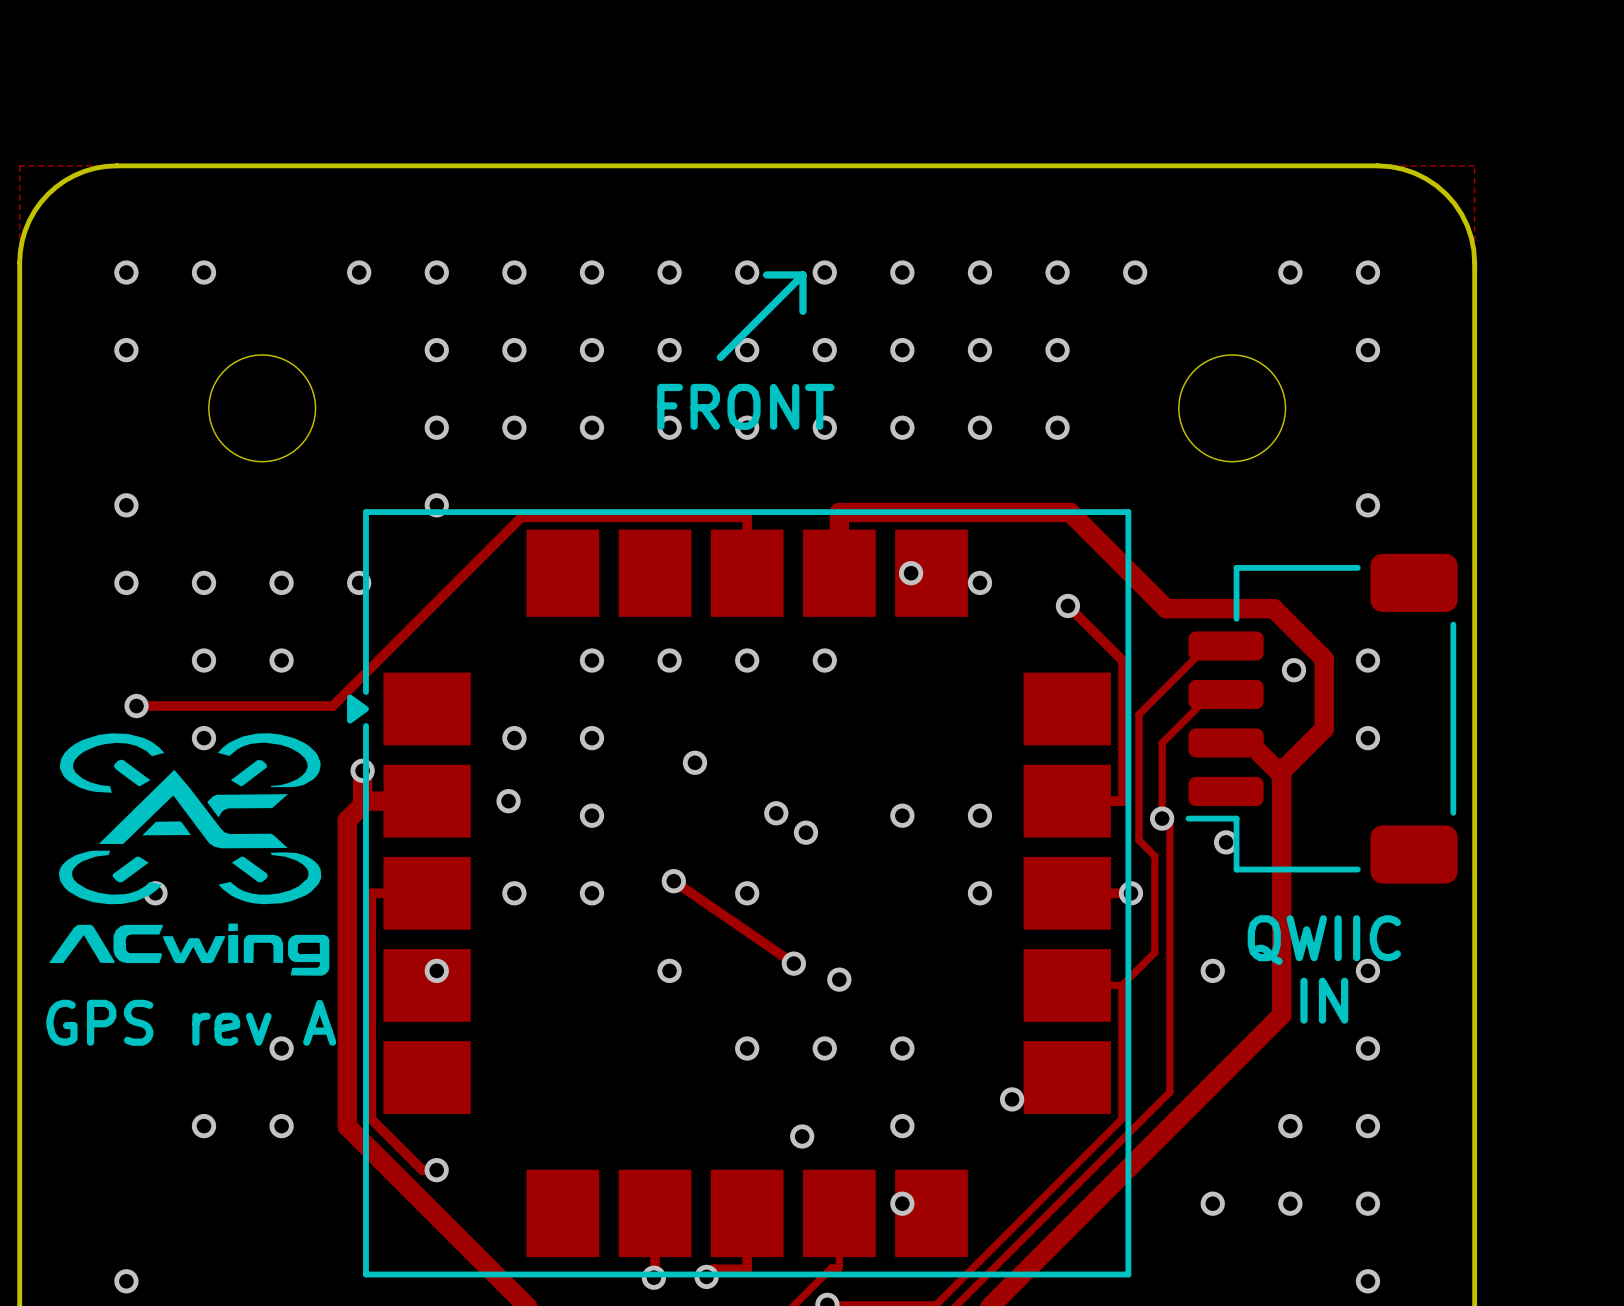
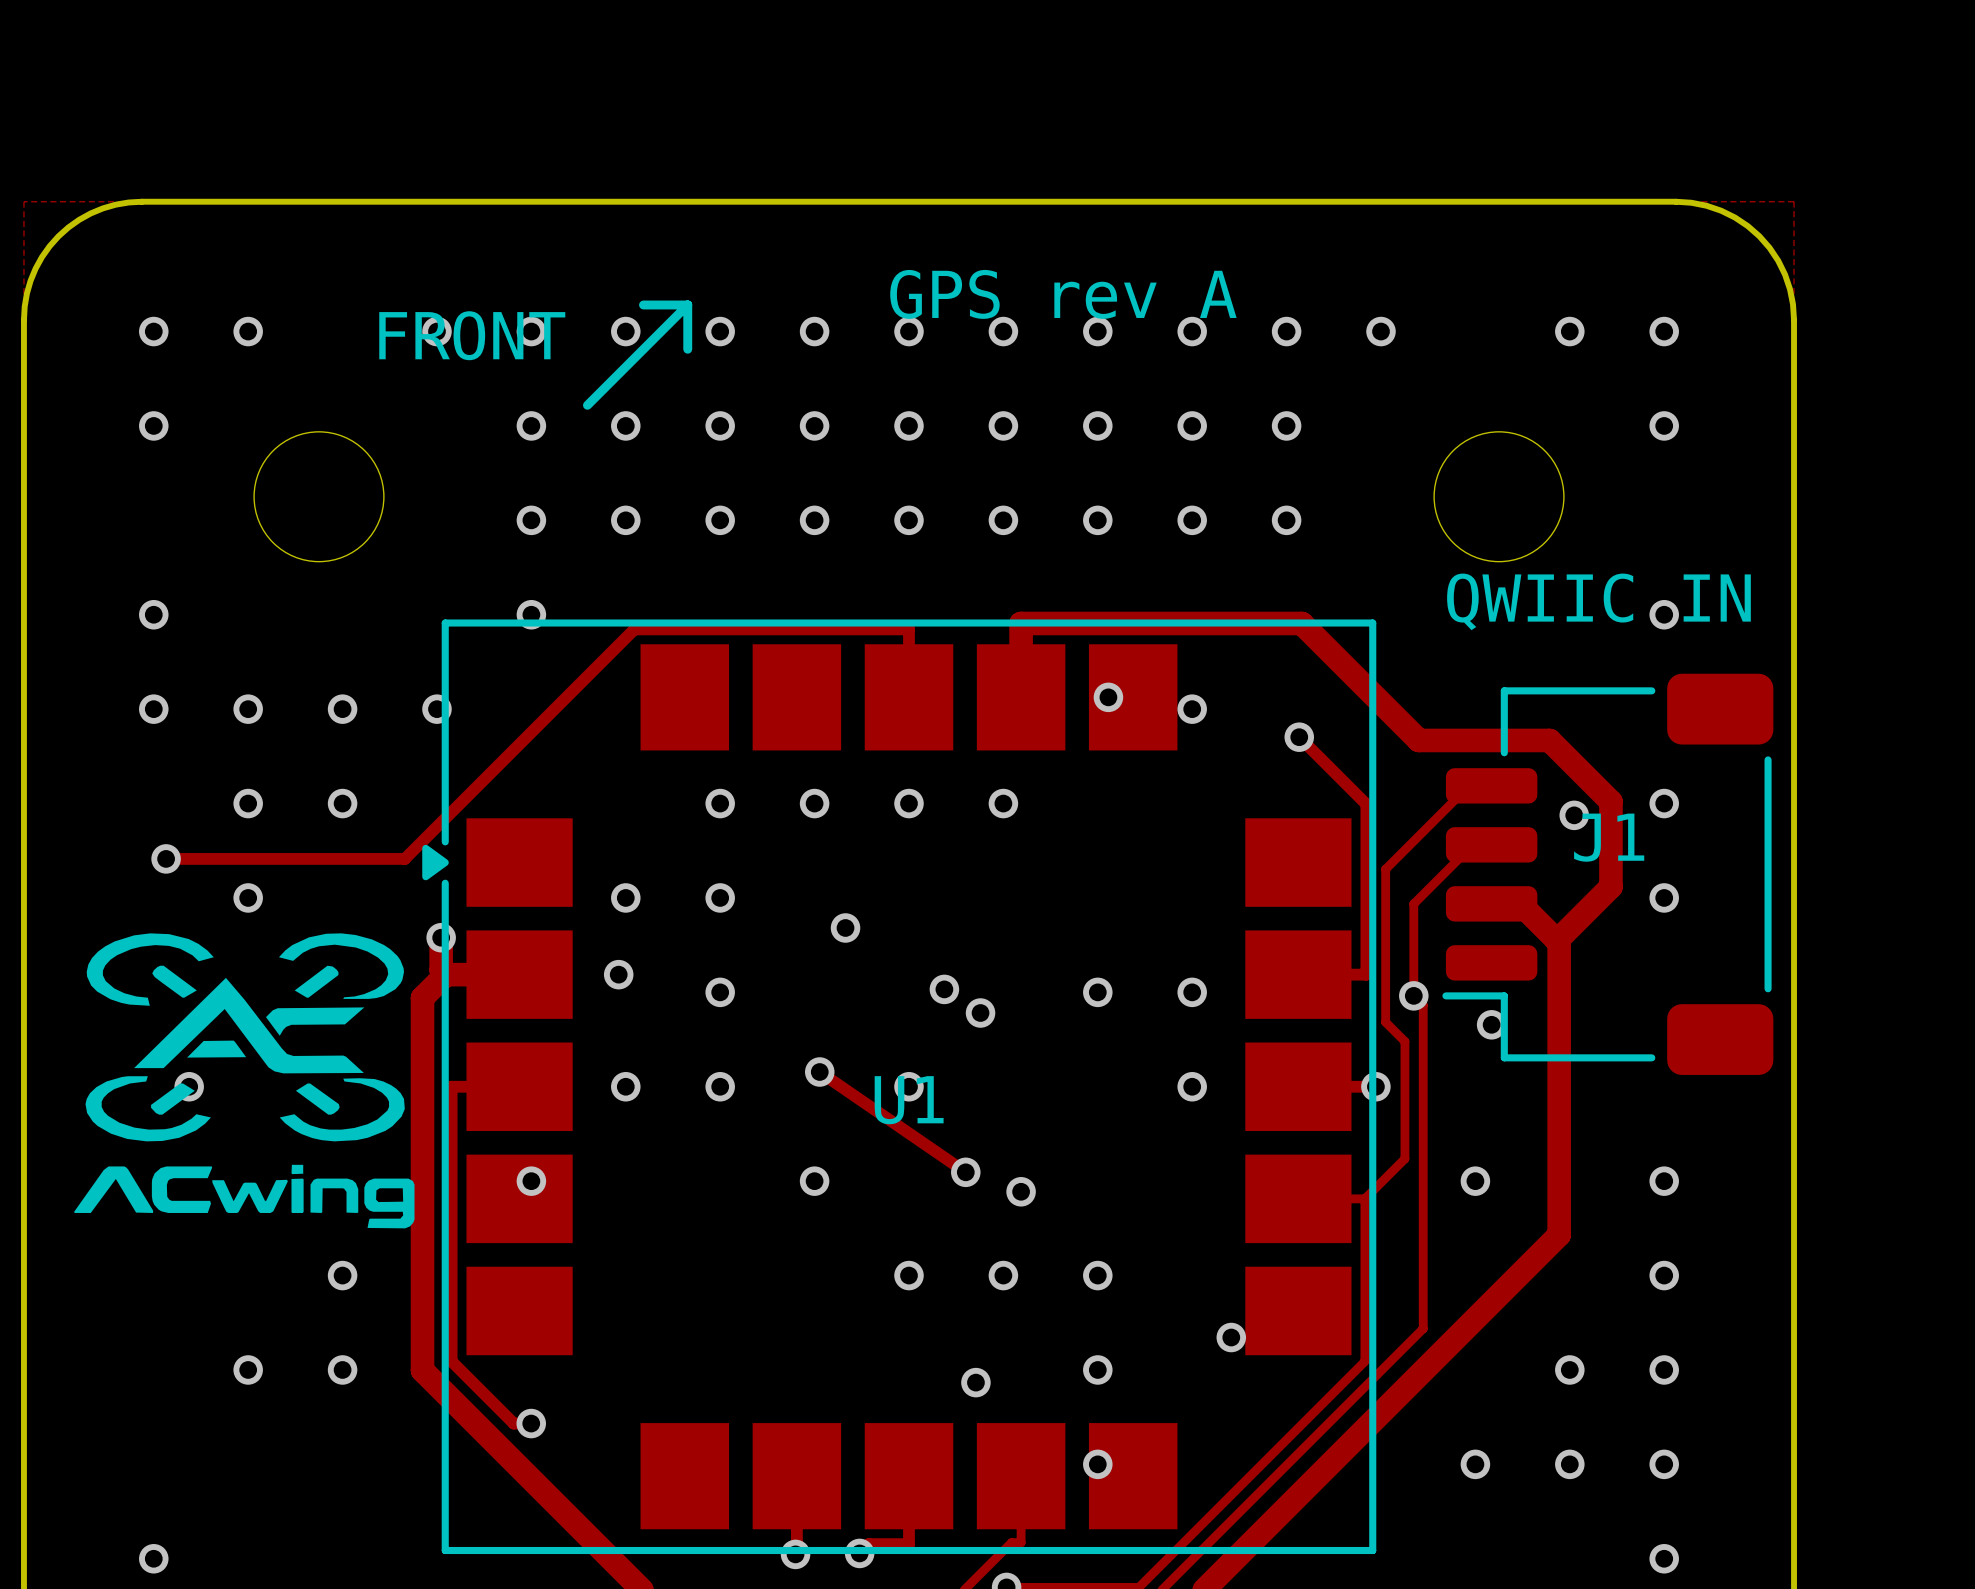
line: (766, 274) (802, 274) -> (643, 304) (687, 304)
line: (802, 274) (720, 357) -> (687, 304) (587, 405)
line: (802, 274) (802, 311) -> (687, 304) (687, 349)
text position: FRONT (745, 406) -> FRONT (472, 335)
text: none -> QWIIC IN (1598, 601)
J1 name: none -> J1 (1609, 837)
drawing position: (189, 854) -> (244, 1080)
U1 name: none -> U1 (909, 1100)
text: QWIIC (1324, 940) -> none
text: IN (1324, 1000) -> none
text position: GPS rev A (191, 1022) -> GPS rev A (1063, 294)

